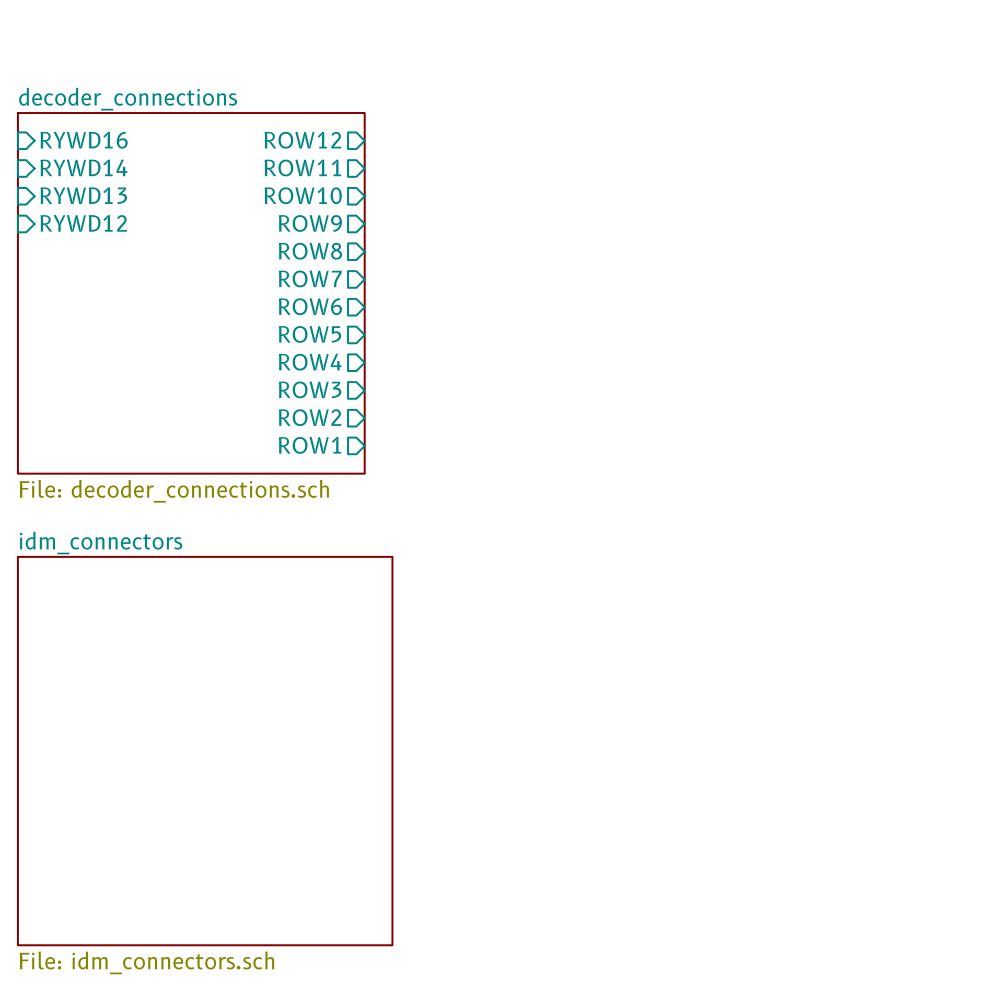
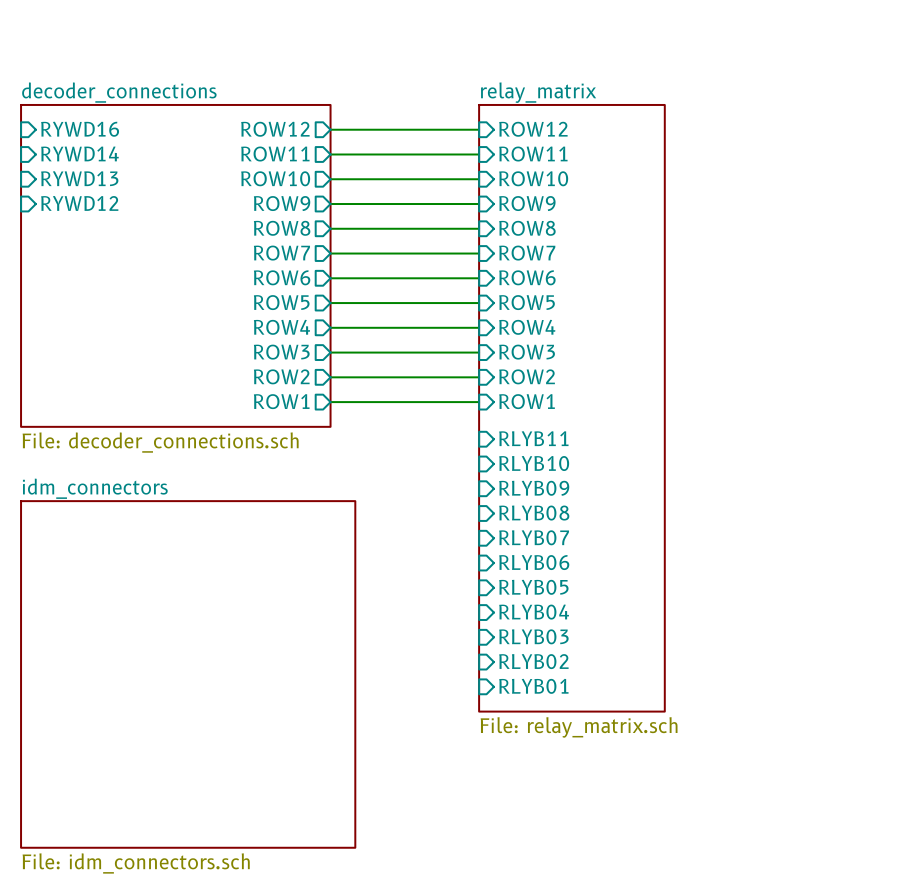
wire: none -> (330, 129) (479, 129)
sheet pin: none -> ROW12 (533, 129)
sheet pin: none -> ROW11 (533, 154)
wire: none -> (330, 154) (479, 154)
sheet pin: none -> ROW10 (533, 178)
wire: none -> (330, 179) (479, 179)
wire: none -> (330, 204) (479, 204)
sheet pin: none -> ROW9 (527, 203)
wire: none -> (330, 228) (479, 228)
sheet pin: none -> ROW8 (527, 228)
sheet pin: none -> ROW7 (527, 253)
wire: none -> (330, 253) (479, 253)
sheet pin: none -> ROW6 (527, 277)
wire: none -> (330, 278) (479, 278)
wire: none -> (330, 303) (479, 303)
sheet pin: none -> ROW5 (527, 302)
wire: none -> (330, 327) (479, 327)
sheet pin: none -> ROW4 (527, 327)
sheet pin: none -> ROW3 (527, 352)
wire: none -> (330, 352) (479, 352)
sheet pin: none -> ROW2 (527, 376)
wire: none -> (330, 377) (479, 377)
wire: none -> (330, 402) (479, 402)
sheet pin: none -> ROW1 (527, 401)
sheet relay_matrix: none -> File: relay_matrix.sch (571, 408)
sheet pin: none -> RLYB11 (533, 438)
sheet pin: none -> RLYB10 (534, 463)
sheet pin: none -> RLYB09 (534, 488)
sheet pin: none -> RLYB08 (534, 513)
sheet pin: none -> RLYB07 (534, 537)
sheet pin: none -> RLYB06 (534, 562)
sheet pin: none -> RLYB05 (533, 587)
sheet pin: none -> RLYB04 (534, 612)
sheet pin: none -> RLYB03 (533, 636)
sheet pin: none -> RLYB02 (533, 661)
sheet pin: none -> RLYB01 (533, 686)

